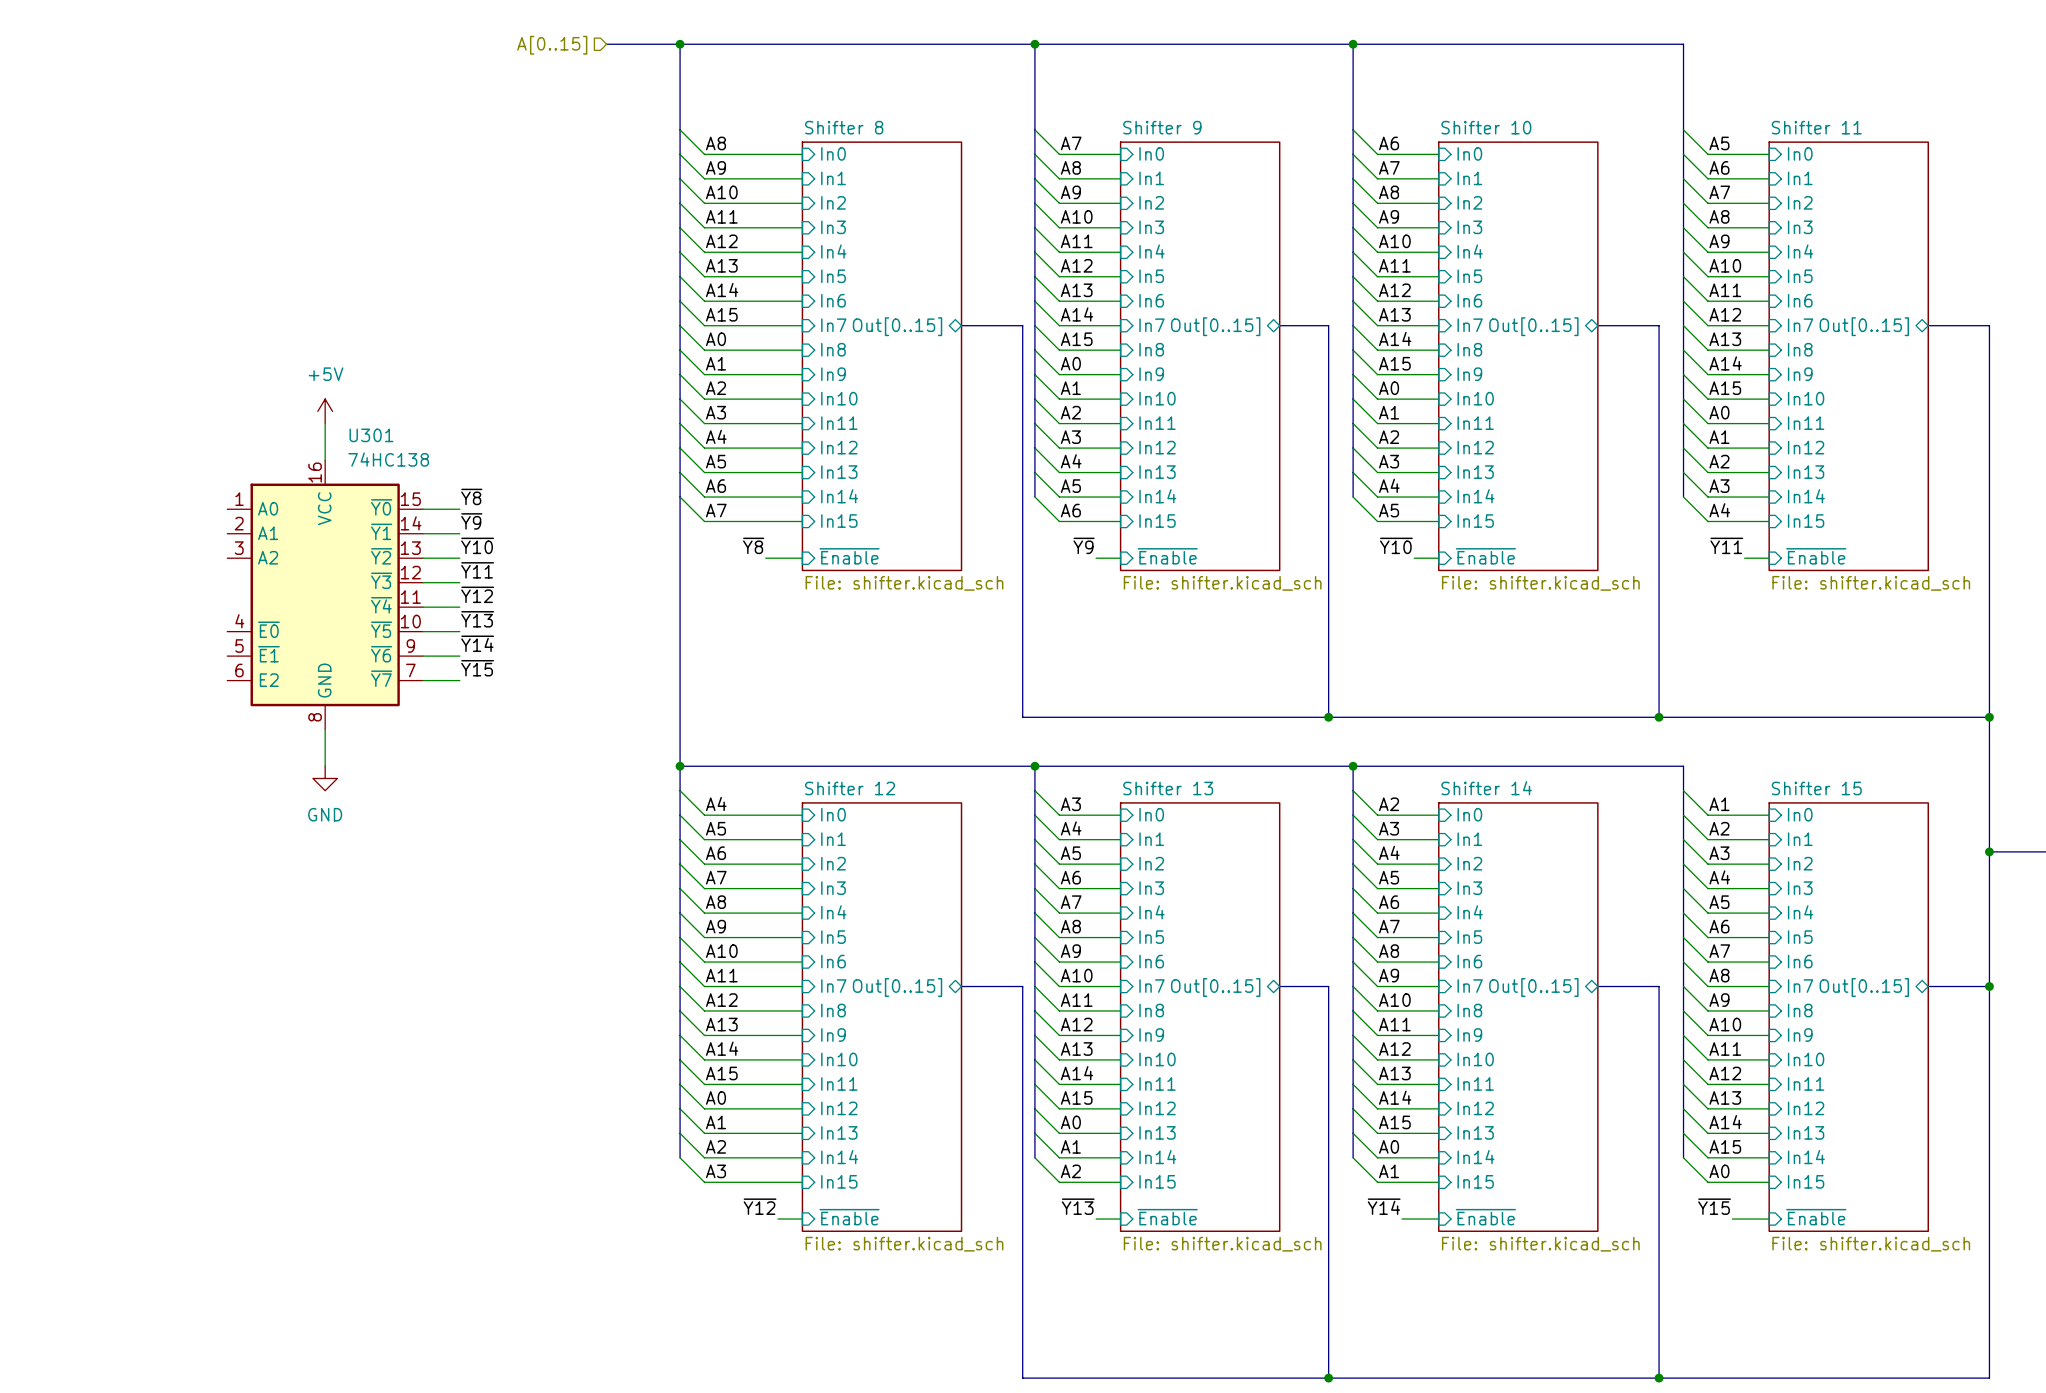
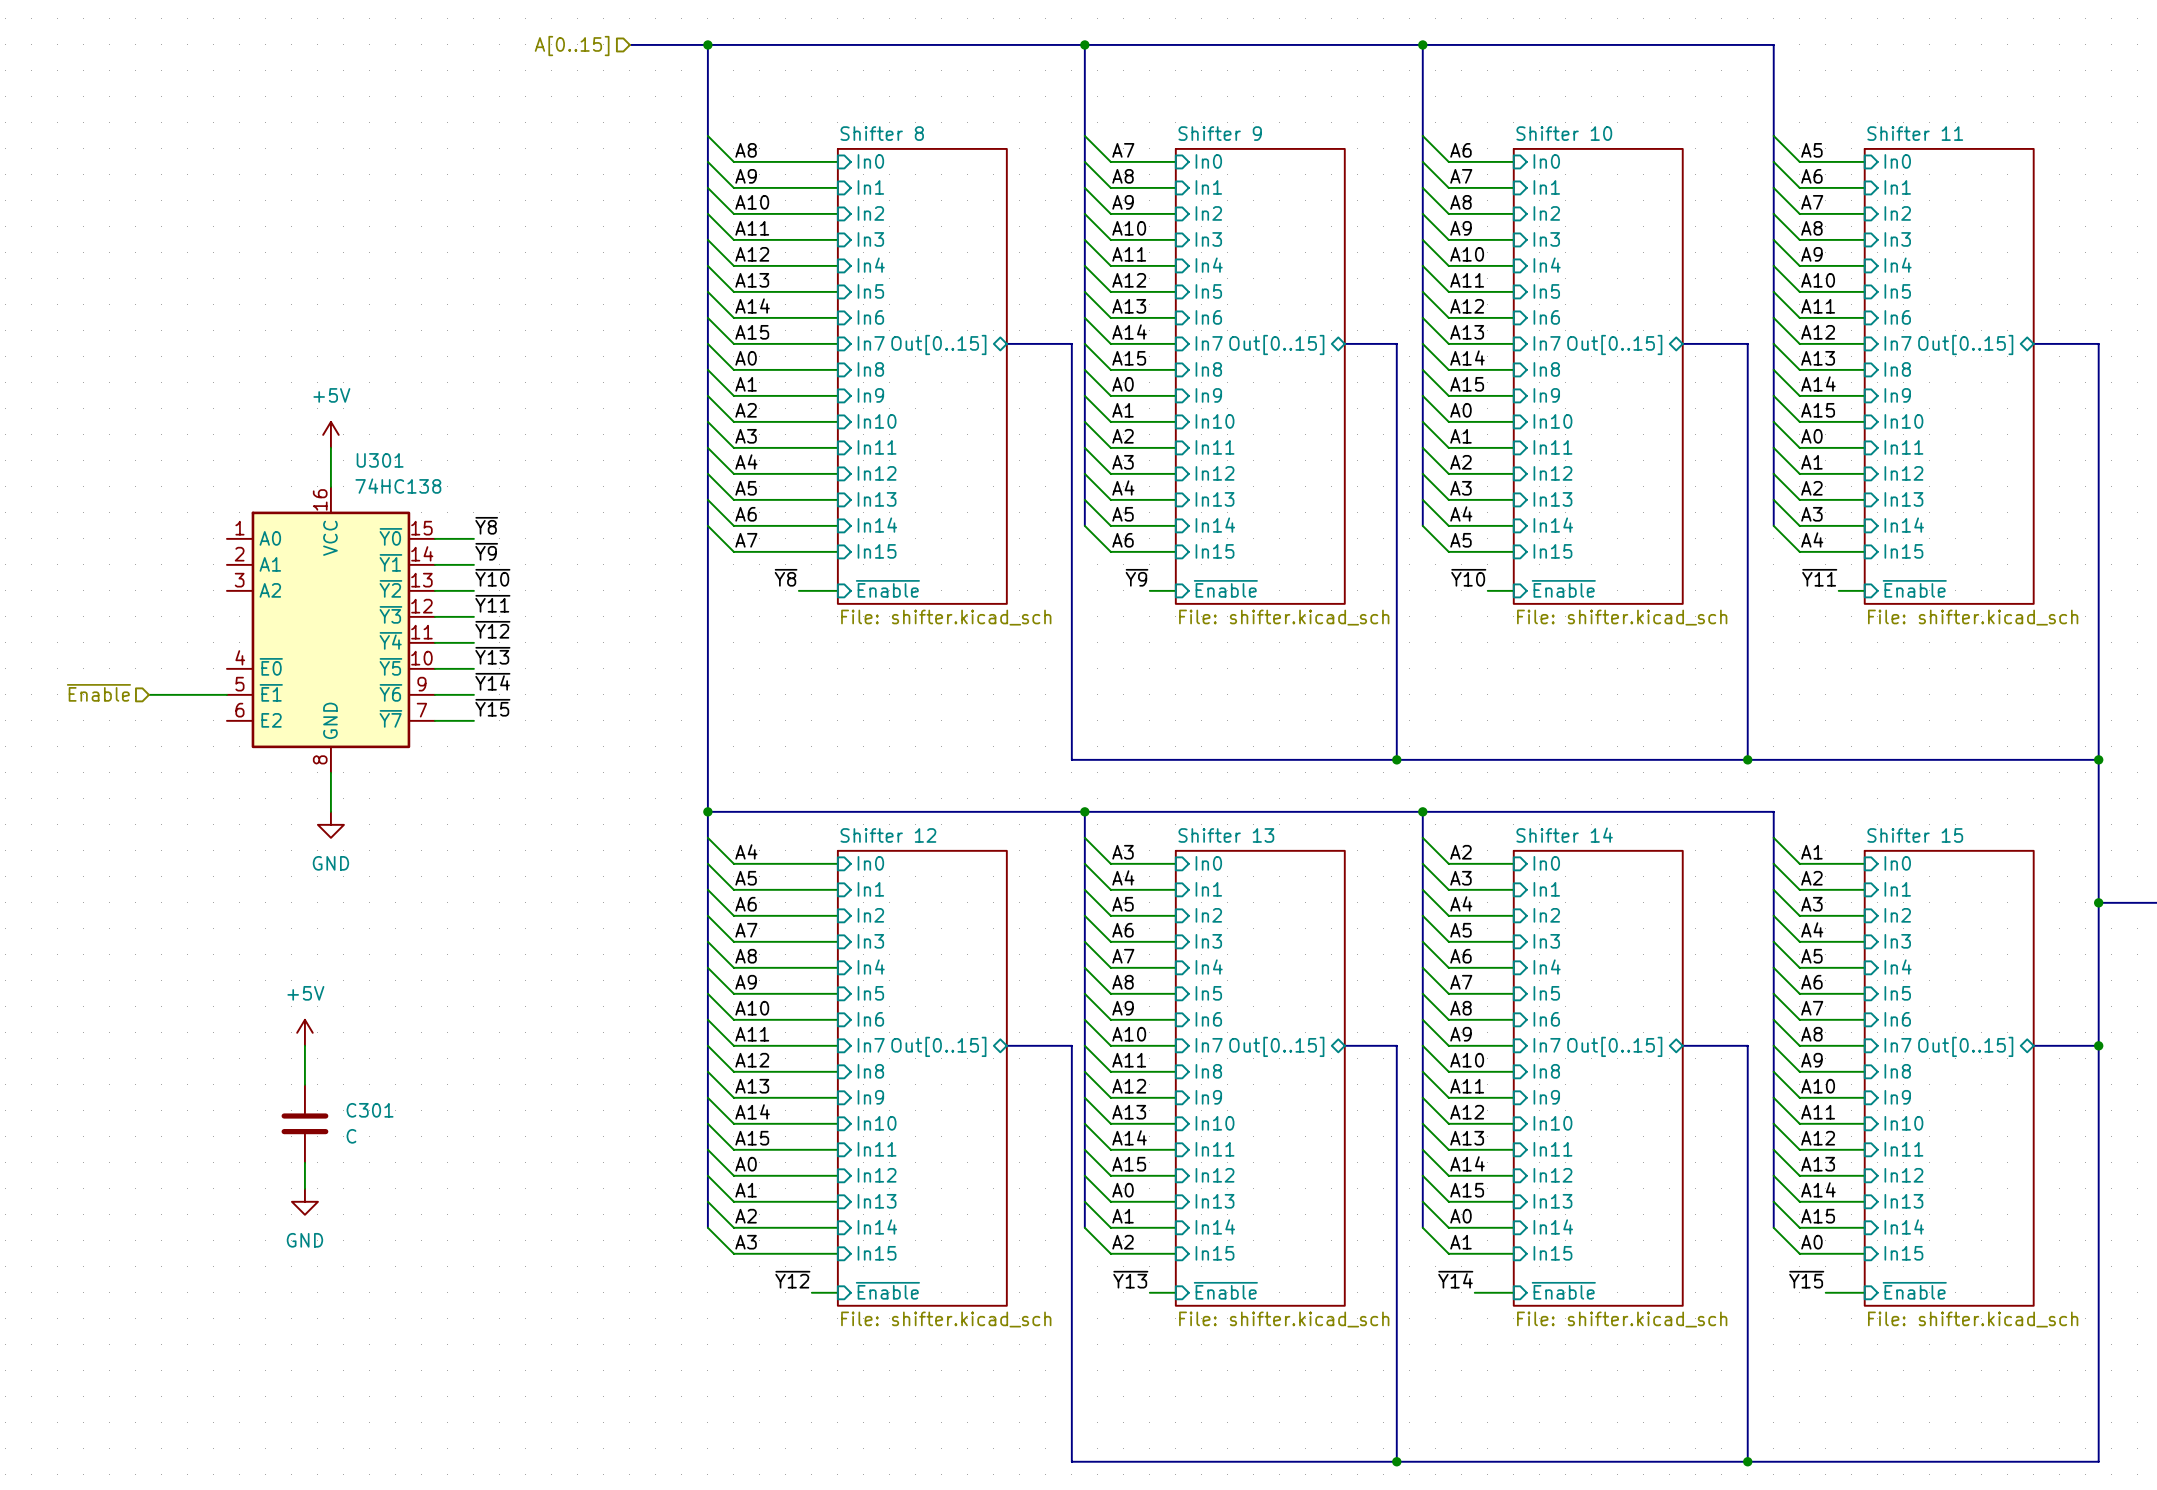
hierarchical label: none -> ~{Enable} (98, 692)
wire: none -> (148, 694) (226, 694)
power symbol: none -> +5V (304, 1032)
wire: none -> (304, 1045) (304, 1084)
C301: none -> C (304, 1123)
wire: none -> (304, 1162) (304, 1188)
power symbol: none -> GND (304, 1201)

